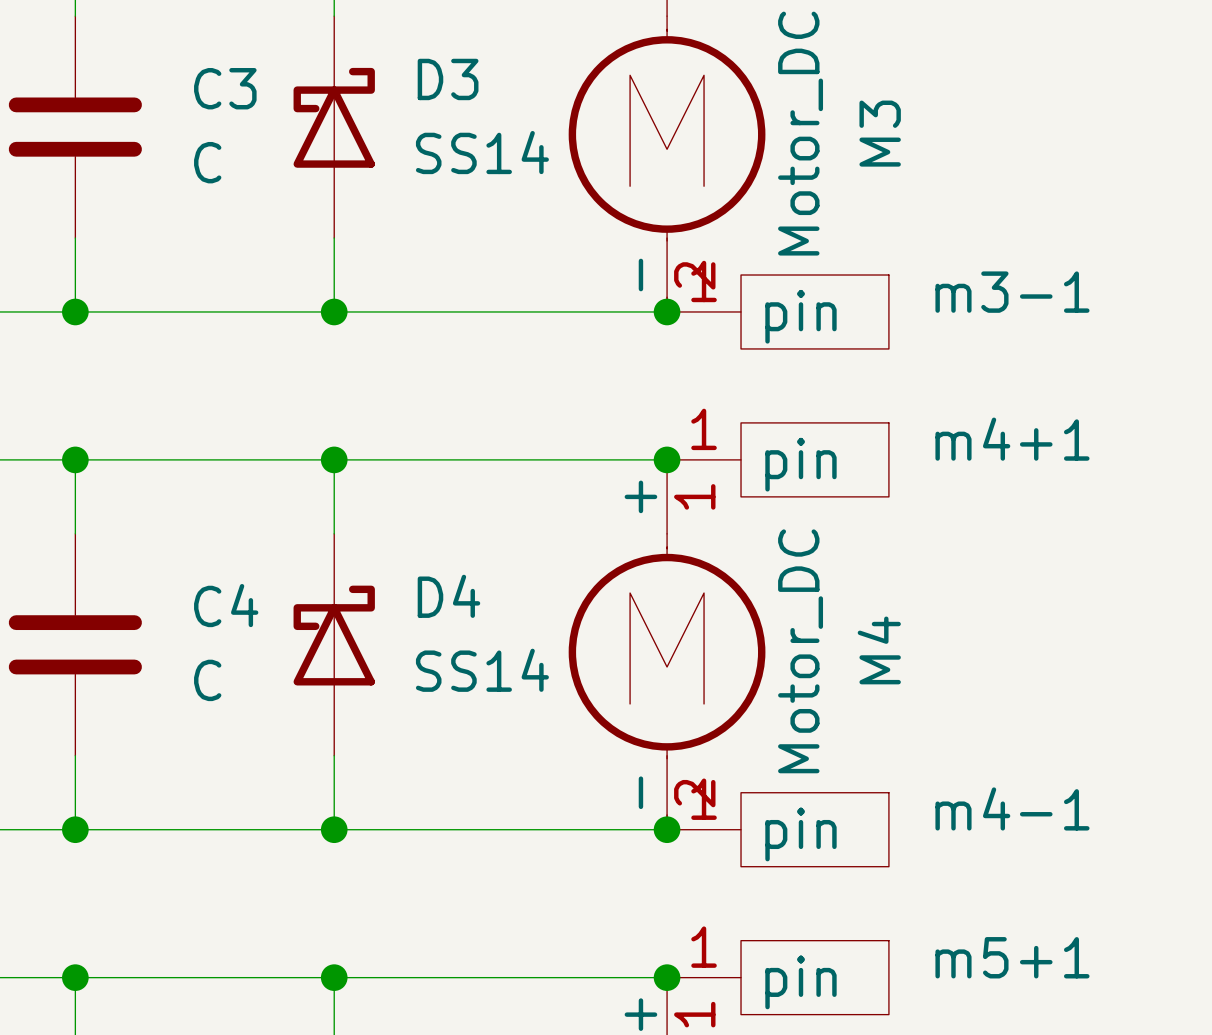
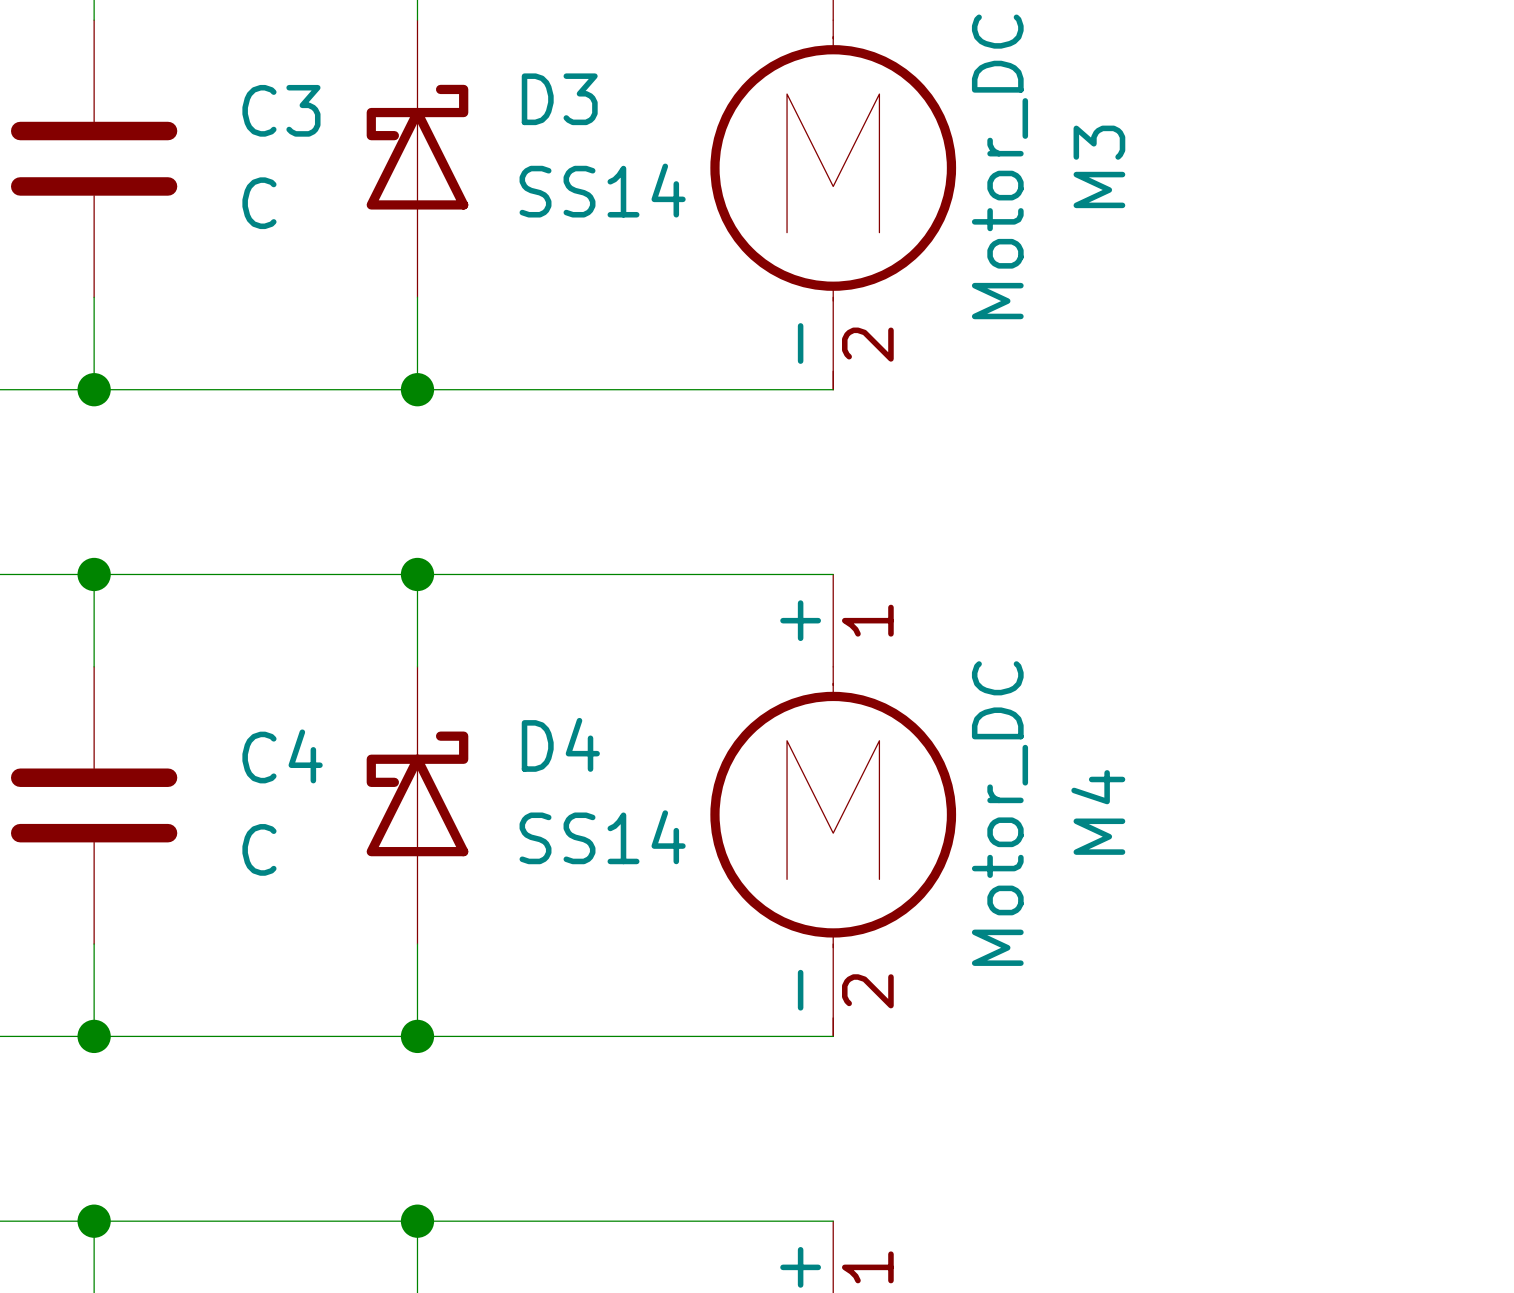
junction: (667, 311) -> none
m3-1: (777, 311) -> none
junction: (667, 459) -> none
m4+1: (777, 459) -> none
junction: (667, 829) -> none
m4-1: (777, 829) -> none
junction: (667, 977) -> none
m5+1: (777, 977) -> none

